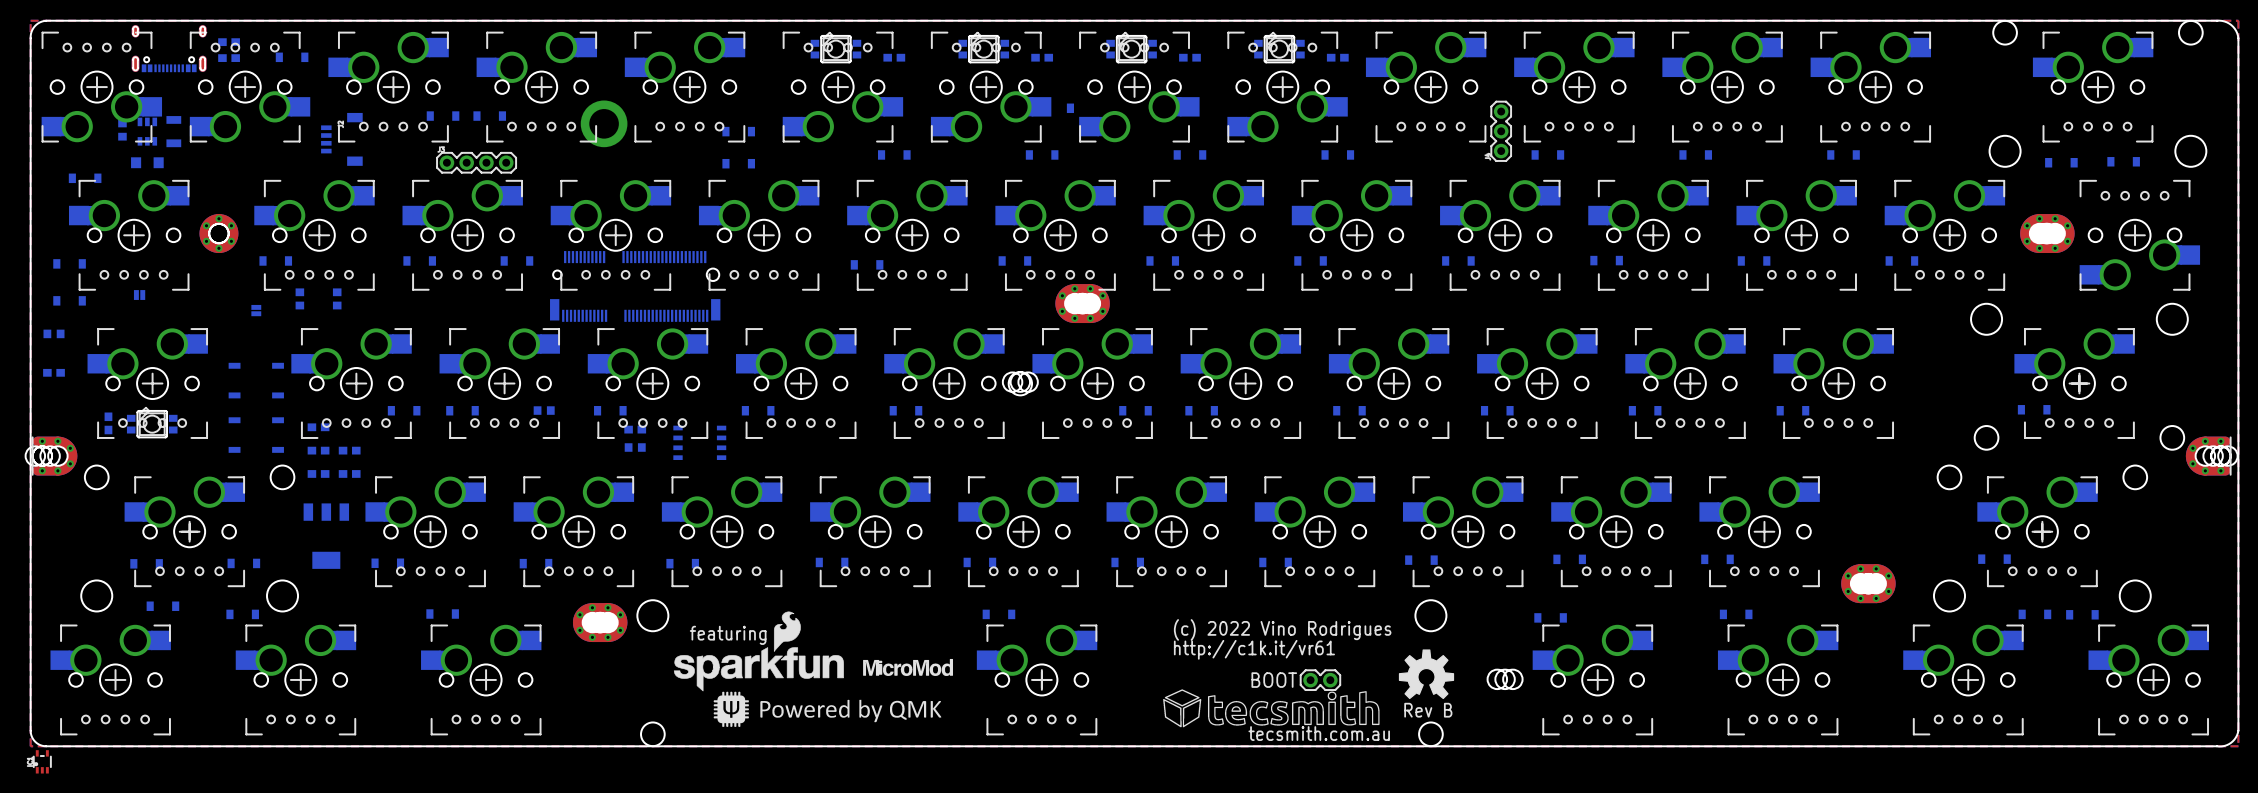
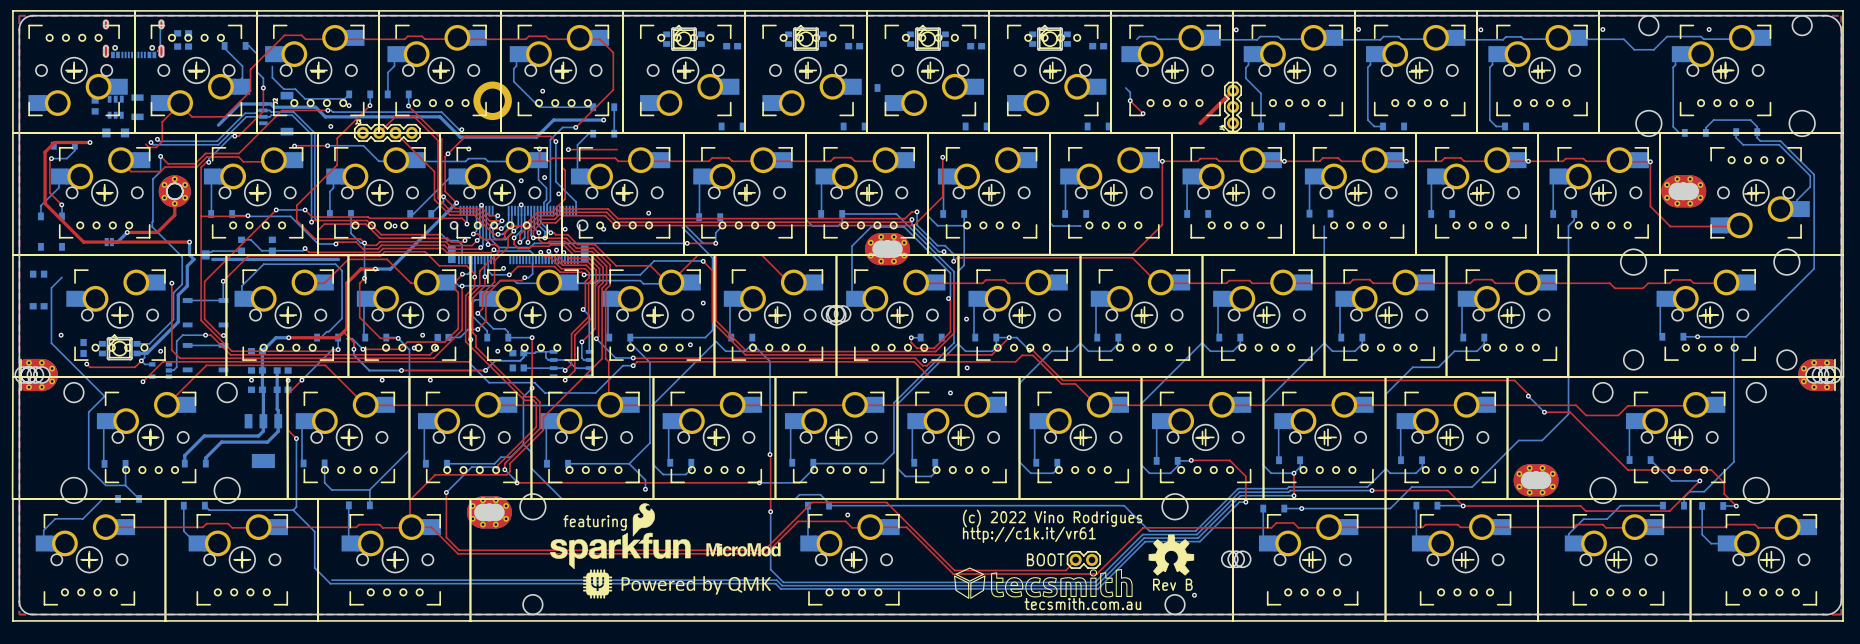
drawing: none -> [12, 10, 1844, 622]
bottom track: none -> (160, 27) (160, 48) (157, 51)
via: none -> (1236, 29)
via: none -> (1358, 29)
via: none -> (1480, 29)
via: none -> (1602, 29)
via: none -> (1709, 29)
bottom track: none -> (1136, 39) (1139, 36) (1154, 36) (1157, 39) (1188, 39)
bottom track: none -> (1209, 39) (1257, 39) (1260, 36) (1278, 36) (1280, 39) (1310, 39)
bottom track: none -> (1331, 39) (1380, 39) (1383, 36) (1398, 36) (1401, 39) (1432, 39)
bottom track: none -> (1453, 39) (1503, 39) (1505, 36) (1554, 39)
bottom track: none -> (1575, 39) (1623, 39) (1634, 49) (1653, 49) (1667, 36) (1737, 39)
bottom track: none -> (224, 46) (242, 66) (241, 88)
bottom track: none -> (245, 45) (248, 45) (257, 54) (257, 72) (263, 78) (263, 87)
bottom track: none -> (394, 55) (394, 66) (387, 72) (387, 94)
bottom track: none -> (516, 55) (513, 81) (539, 107) (593, 107)
bottom track: none -> (1248, 55) (1245, 78) (1261, 93) (1261, 126)
bottom track: none -> (1370, 55) (1370, 64) (1367, 67) (1367, 120) (1374, 126) (1383, 126)
bottom track: none -> (1492, 55) (1492, 64) (1489, 67) (1489, 120) (1496, 126) (1505, 126)
bottom track: none -> (1675, 55) (1675, 65) (1673, 67) (1673, 126) (1679, 132) (1684, 132)
bottom track: none -> (272, 66) (272, 77) (283, 89) (295, 89) (305, 98) (344, 98) (349, 94)
top track: none -> (263, 87) (263, 111) (238, 136) (234, 136)
via: none -> (263, 87)
bottom track: none -> (1125, 87) (1130, 92) (1130, 100)
top track: none -> (1233, 90) (1200, 123)
via: none -> (542, 91)
bottom track: none -> (370, 94) (369, 105)
bottom track: none -> (408, 94) (408, 105)
top track: none -> (1130, 100) (1143, 113)
via: none -> (1130, 100)
via: none -> (349, 105)
top track: none -> (369, 105) (337, 138) (337, 165) (296, 205) (296, 220) (315, 238) (360, 238) (366, 245) (376, 245) (379, 241) (445, 241) (449, 245) (472, 245) (477, 240)
via: none -> (369, 105)
top track: none -> (408, 105) (441, 138) (441, 194) (455, 208) (477, 208) (489, 220) (501, 220)
via: none -> (408, 105)
bottom track: none -> (614, 107) (615, 132)
bottom track: none -> (327, 110) (332, 112) (441, 112) (459, 129) (461, 129)
top track: none -> (327, 110) (282, 110) (238, 153) (205, 153) (195, 163) (168, 163) (160, 156)
via: none -> (327, 110)
via: none -> (1143, 113)
bottom track: none -> (603, 120) (553, 120) (536, 137) (460, 137) (439, 116) (325, 116) (315, 107) (273, 107) (270, 104) (239, 104) (218, 125)
via: none -> (603, 120)
via: none -> (330, 126)
bottom track: none -> (575, 127) (562, 127) (550, 139) (550, 200) (547, 204) (547, 214)
top track: none -> (575, 127) (613, 89) (613, 52) (599, 39) (548, 39) (545, 36) (528, 36) (525, 39) (424, 39) (421, 36) (407, 36) (404, 39) (305, 39) (301, 35) (284, 35) (250, 69) (250, 91) (224, 116) (191, 116) (179, 104) (162, 121) (162, 141) (156, 147) (148, 147) (145, 144)
via: none -> (575, 127)
via: none -> (461, 129)
bottom track: none -> (1736, 132) (1736, 137) (1743, 144) (1779, 144) (1810, 175) (1810, 186) (1797, 200) (1797, 210)
top track: none -> (379, 132) (395, 116) (414, 116) (438, 140) (438, 198) (451, 211) (475, 211) (492, 228) (501, 228)
top track: none -> (395, 132) (434, 171) (434, 199) (449, 215) (474, 215) (493, 234) (498, 234)
bottom track: none -> (1705, 132) (1705, 127) (1713, 120) (1750, 120) (1757, 126) (1757, 137) (1760, 141) (1780, 141) (1814, 174) (1814, 268) (1746, 336) (1683, 336)
bottom track: none -> (593, 133) (588, 133) (577, 145) (577, 177)
bottom track: none -> (234, 136) (231, 136) (208, 159) (208, 162)
via: none -> (234, 136)
bottom track: none -> (157, 139) (159, 141) (217, 141) (245, 113) (255, 113) (258, 110) (293, 111) (314, 133) (314, 218) (317, 221) (317, 230)
via: none -> (157, 139)
bottom track: none -> (555, 141) (555, 181) (576, 201) (576, 214)
top track: none -> (555, 141) (550, 136) (465, 136) (445, 156) (445, 191) (456, 202)
via: none -> (555, 141)
top track: none -> (90, 142) (54, 142) (45, 152) (45, 203) (83, 242) (189, 242)
via: none -> (90, 142)
bottom track: none -> (151, 142) (153, 144) (218, 144) (246, 116) (292, 115) (311, 134) (311, 222)
via: none -> (151, 142)
bottom track: none -> (74, 145) (74, 150) (66, 158) (51, 158)
via: none -> (294, 146)
bottom track: none -> (327, 145) (363, 145) (378, 161) (395, 161)
top track: none -> (327, 145) (294, 146)
via: none -> (327, 145)
via: none -> (468, 148)
bottom track: none -> (539, 148) (538, 180) (546, 188) (543, 214)
top track: none -> (539, 148) (539, 161)
via: none -> (539, 148)
top track: none -> (568, 149) (617, 149)
via: none -> (568, 149)
via: none -> (448, 153)
bottom track: none -> (160, 156) (160, 171) (152, 179) (152, 226) (182, 256) (182, 284) (173, 292) (173, 319) (149, 343) (137, 343)
via: none -> (160, 156)
top track: none -> (942, 157) (942, 196) (914, 225) (615, 225) (605, 215) (562, 215) (555, 222) (541, 222) (533, 230) (533, 237)
via: none -> (942, 157)
top track: none -> (51, 158) (49, 160) (49, 192) (61, 204)
via: none -> (51, 158)
top track: none -> (120, 161) (131, 171) (160, 171) (165, 167) (196, 167) (206, 156) (238, 156) (243, 161) (273, 161)
bottom track: none -> (416, 161) (465, 161) (468, 158) (485, 158) (488, 161) (517, 161)
top track: none -> (517, 161) (549, 161) (552, 158) (615, 158) (618, 161) (709, 161) (712, 157) (728, 157) (732, 161) (830, 161) (834, 157) (851, 157) (854, 161) (883, 161)
via: none -> (1162, 161)
via: none -> (1284, 161)
via: none -> (1406, 161)
via: none -> (1528, 161)
via: none -> (1650, 161)
top track: none -> (208, 162) (201, 167) (201, 320) (231, 351) (336, 351) (338, 349)
via: none -> (208, 162)
top track: none -> (562, 167) (565, 170) (565, 198) (551, 212) (537, 212) (523, 226) (511, 226) (504, 233) (502, 239) (483, 239) (477, 234) (473, 234)
bottom track: none -> (58, 177) (58, 187) (40, 205) (40, 216)
bottom track: none -> (211, 177) (211, 213)
bottom track: none -> (333, 177) (333, 188) (329, 191) (329, 213)
bottom track: none -> (455, 177) (449, 177) (413, 213) (410, 213)
via: none -> (544, 177)
bottom track: none -> (821, 177) (821, 213)
bottom track: none -> (943, 177) (943, 213)
bottom track: none -> (1065, 177) (1065, 213)
bottom track: none -> (1187, 177) (1187, 213)
bottom track: none -> (1309, 177) (1309, 213)
bottom track: none -> (1431, 177) (1431, 213)
bottom track: none -> (1553, 177) (1553, 213)
bottom track: none -> (699, 177) (699, 217)
via: none -> (521, 180)
via: none -> (558, 193)
bottom track: none -> (443, 196) (443, 201) (431, 213)
via: none -> (443, 196)
via: none -> (456, 202)
top track: none -> (174, 203) (174, 215) (157, 232) (127, 232)
bottom track: none -> (456, 203) (390, 269) (375, 269)
bottom track: none -> (61, 204) (62, 216)
via: none -> (61, 204)
via: none -> (521, 204)
top track: none -> (481, 205) (481, 207) (489, 215) (497, 215)
via: none -> (481, 205)
bottom track: none -> (276, 209) (305, 209)
top track: none -> (276, 209) (204, 281) (204, 319) (221, 335) (223, 335)
via: none -> (276, 209)
top track: none -> (305, 209) (312, 217) (462, 218) (466, 224)
via: none -> (305, 209)
bottom track: none -> (917, 211) (917, 225) (937, 245) (945, 245) (953, 254) (953, 261)
top track: none -> (917, 211) (911, 211) (905, 218) (617, 218) (608, 209) (560, 209) (553, 215) (538, 215) (519, 234) (519, 242)
via: none -> (917, 211)
bottom track: none -> (232, 213) (248, 216) (290, 216) (318, 243) (335, 243)
bottom track: none -> (350, 213) (350, 233) (360, 243) (364, 243) (364, 278)
via: none -> (648, 213)
bottom track: none -> (964, 213) (964, 265) (957, 271) (957, 343)
bottom track: none -> (1574, 213) (1574, 220) (1568, 226) (1568, 414) (1542, 440) (1518, 440) (1472, 487) (1411, 487) (1390, 508) (1284, 508)
bottom track: none -> (466, 214) (466, 224)
bottom track: none -> (476, 214) (476, 230) (473, 234)
bottom track: none -> (479, 214) (479, 237) (477, 240)
bottom track: none -> (482, 214) (482, 245) (480, 247)
bottom track: none -> (486, 214) (486, 240) (488, 244)
bottom track: none -> (508, 214) (508, 222) (501, 228)
bottom track: none -> (511, 214) (511, 225) (502, 234) (498, 234)
bottom track: none -> (518, 214) (518, 226) (505, 239) (495, 239) (493, 236) (493, 229) (501, 220)
bottom track: none -> (521, 214) (521, 230) (514, 237)
bottom track: none -> (524, 214) (524, 237) (519, 242)
bottom track: none -> (531, 214) (531, 235) (533, 237)
bottom track: none -> (534, 214) (534, 228) (538, 232)
bottom track: none -> (537, 214) (537, 224) (544, 231) (544, 237)
bottom track: none -> (540, 214) (540, 222) (550, 232)
top track: none -> (247, 215) (201, 216)
via: none -> (247, 215)
bottom track: none -> (497, 215) (496, 220) (489, 227) (489, 238) (499, 247) (530, 247) (534, 243) (687, 243)
via: none -> (497, 215)
bottom track: none -> (927, 216) (937, 225) (964, 225)
bottom track: none -> (720, 217) (720, 228) (715, 232) (715, 243) (703, 243) (685, 225)
bottom track: none -> (805, 219) (812, 226) (838, 226) (842, 221) (842, 213) (896, 213) (953, 271) (953, 342) (893, 402) (893, 452) (883, 463) (813, 462) (813, 469) (799, 482) (759, 482)
bottom track: none -> (911, 219) (911, 224) (938, 251) (944, 251)
top track: none -> (911, 219) (910, 222) (616, 222) (606, 212) (561, 212) (554, 219) (540, 219) (527, 231) (527, 242)
via: none -> (911, 219)
via: none -> (501, 220)
top track: none -> (311, 222) (313, 220) (367, 220) (381, 234) (438, 234) (440, 233)
via: none -> (311, 222)
bottom track: none -> (1049, 222) (1053, 226) (1080, 226)
via: none -> (466, 224)
via: none -> (395, 226)
bottom track: none -> (1324, 226) (1324, 342) (1332, 351) (1355, 351) (1362, 343) (1362, 337)
top track: none -> (1735, 226) (1670, 226) (1650, 206) (1650, 161) (1586, 161) (1583, 158) (1565, 158) (1563, 161) (1464, 161) (1460, 157) (1444, 157) (1441, 161) (1341, 161) (1338, 157) (1323, 157) (1319, 161) (1219, 161) (1216, 158) (1200, 158) (1197, 161) (1162, 161) (1162, 224) (1132, 254) (946, 254) (944, 251)
bottom track: none -> (682, 227) (712, 257) (712, 330) (705, 337) (630, 337) (630, 342) (649, 362) (649, 443) (629, 463)
via: none -> (501, 228)
via: none -> (565, 229)
via: none -> (603, 229)
top track: none -> (317, 230) (324, 224) (365, 224) (379, 238) (447, 238) (451, 242) (465, 240)
top track: none -> (513, 231) (508, 236) (508, 247) (494, 260) (494, 282) (482, 294) (482, 308) (477, 313)
via: none -> (513, 231)
bottom track: none -> (127, 232) (117, 242) (111, 242)
via: none -> (127, 232)
top track: none -> (538, 232) (538, 239) (542, 243) (564, 241) (574, 251) (591, 251) (606, 266) (606, 283) (602, 288) (602, 358) (543, 417) (543, 430) (509, 463) (509, 471) (506, 474) (435, 474) (410, 499) (410, 527)
via: none -> (538, 232)
top track: none -> (550, 232) (567, 234) (577, 244) (595, 244) (616, 265) (650, 265) (668, 283) (698, 254) (761, 254) (790, 283)
via: none -> (550, 232)
bottom track: none -> (440, 233) (447, 240) (457, 240) (462, 244) (462, 263)
via: none -> (473, 234)
via: none -> (498, 234)
top track: none -> (514, 237) (514, 244) (518, 248) (563, 244) (573, 255) (590, 255) (603, 267) (603, 282) (598, 287) (598, 336) (596, 338)
via: none -> (514, 237)
via: none -> (533, 237)
top track: none -> (544, 237) (566, 238) (576, 248) (593, 248) (610, 264) (610, 285) (605, 289) (605, 358) (608, 361) (608, 405) (974, 405)
via: none -> (544, 237)
bottom track: none -> (241, 239) (250, 239) (261, 250) (302, 250) (305, 248)
via: none -> (465, 240)
via: none -> (477, 240)
bottom track: none -> (189, 242) (189, 254) (194, 259) (187, 266) (187, 286) (178, 295) (178, 322) (146, 353) (137, 353)
via: none -> (189, 242)
via: none -> (519, 242)
via: none -> (527, 242)
via: none -> (364, 243)
top track: none -> (687, 243) (715, 243)
via: none -> (687, 243)
via: none -> (715, 243)
top track: none -> (335, 243) (337, 242) (356, 242) (362, 248) (378, 248) (381, 245) (444, 245) (448, 249) (479, 249) (480, 247)
via: none -> (335, 243)
top track: none -> (488, 244) (495, 244) (499, 247) (499, 251) (479, 270) (479, 286) (469, 296) (469, 338) (470, 339)
via: none -> (488, 244)
via: none -> (480, 247)
top track: none -> (305, 248) (308, 252) (379, 252) (383, 248) (442, 248) (447, 252) (491, 252) (493, 249)
via: none -> (305, 248)
bottom track: none -> (493, 249) (530, 251) (535, 256) (535, 263)
via: none -> (493, 249)
top track: none -> (556, 250) (556, 254) (564, 261) (587, 261) (596, 270) (596, 280) (592, 284) (592, 317) (574, 335) (574, 370) (565, 380)
via: none -> (556, 250)
bottom track: none -> (241, 250) (205, 252)
top track: none -> (548, 251) (562, 265) (586, 265) (592, 271) (592, 278) (588, 282) (588, 316) (571, 333) (571, 364) (565, 370)
via: none -> (548, 251)
via: none -> (944, 251)
top track: none -> (540, 252) (544, 256) (549, 256) (561, 268) (585, 268) (589, 272) (589, 277) (585, 281) (585, 307) (583, 309)
via: none -> (540, 252)
top track: none -> (563, 252) (569, 258) (589, 258) (599, 268) (599, 281) (595, 285) (595, 328) (581, 341)
via: none -> (563, 252)
top track: none -> (716, 254) (716, 320) (746, 351) (935, 351) (954, 332) (954, 283)
bottom track: none -> (212, 259) (338, 259)
bottom track: none -> (703, 261) (654, 261) (640, 274) (584, 274)
top track: none -> (703, 261) (712, 270) (712, 321) (745, 354) (991, 354) (1009, 337)
via: none -> (703, 261)
top track: none -> (953, 261) (957, 257) (1132, 257) (1157, 283) (1226, 283) (1229, 280) (1249, 280) (1252, 283) (1349, 283) (1353, 279) (1369, 279) (1373, 283) (1470, 283) (1473, 279) (1491, 279) (1495, 283) (1609, 283) (1614, 288) (1643, 288) (1648, 283) (1669, 283) (1672, 279) (1690, 279) (1693, 283) (1722, 283)
via: none -> (953, 261)
bottom track: none -> (471, 263) (471, 270) (467, 274) (462, 274)
bottom track: none -> (474, 263) (474, 277)
bottom track: none -> (484, 263) (484, 276)
bottom track: none -> (487, 263) (488, 271) (492, 274) (509, 274)
bottom track: none -> (532, 263) (532, 274) (528, 277) (524, 277)
via: none -> (503, 268)
top track: none -> (375, 269) (360, 269) (346, 283) (346, 328) (337, 337) (288, 337)
via: none -> (375, 269)
top track: none -> (462, 274) (455, 281) (455, 289) (458, 292) (458, 328) (444, 342) (407, 342) (400, 349) (362, 349)
via: none -> (462, 274)
top track: none -> (509, 274) (517, 266) (554, 266) (560, 272) (581, 272) (584, 274)
via: none -> (509, 274)
via: none -> (584, 274)
bottom track: none -> (62, 277) (51, 287) (51, 343) (104, 396) (88, 412) (88, 468) (105, 485) (125, 485)
via: none -> (474, 277)
top track: none -> (484, 276) (484, 286) (472, 298) (472, 332) (475, 335) (475, 347) (525, 396) (534, 396) (539, 401) (539, 428) (504, 463) (504, 469)
via: none -> (484, 276)
top track: none -> (364, 278) (359, 283) (359, 317) (380, 338) (398, 338)
via: none -> (364, 278)
top track: none -> (524, 277) (521, 280) (500, 280) (485, 295) (485, 321) (477, 329)
via: none -> (524, 277)
bottom track: none -> (223, 281) (223, 300) (187, 300)
top track: none -> (223, 281) (248, 255) (380, 255) (384, 251) (425, 251) (439, 265) (466, 265) (474, 273) (474, 286) (465, 295) (465, 341) (524, 400) (533, 400) (536, 403) (536, 426) (498, 465) (498, 469)
via: none -> (223, 281)
top track: none -> (171, 283) (171, 350) (179, 358) (433, 358) (462, 330) (462, 286)
via: none -> (171, 283)
top track: none -> (303, 283) (324, 283) (348, 259) (387, 259) (411, 283) (425, 283)
bottom track: none -> (446, 283) (456, 283) (458, 286) (495, 285) (500, 280) (514, 280) (517, 283) (547, 283)
bottom track: none -> (568, 283) (594, 283) (597, 280) (640, 280) (643, 283) (669, 283)
top track: none -> (913, 283) (982, 283) (985, 279) (1004, 279) (1007, 283) (1036, 283)
via: none -> (462, 286)
bottom track: none -> (948, 298) (950, 296) (950, 273) (904, 226) (871, 226) (851, 246) (851, 299)
top track: none -> (948, 298) (950, 300) (950, 331) (934, 348) (917, 348) (911, 342) (911, 337)
via: none -> (948, 298)
bottom track: none -> (241, 299) (241, 285) (263, 264) (335, 264) (342, 270) (342, 318) (328, 331) (320, 337) (317, 337)
bottom track: none -> (363, 299) (365, 337)
bottom track: none -> (485, 299) (475, 299) (472, 303) (472, 315) (487, 330) (487, 337)
bottom track: none -> (607, 299) (609, 337)
bottom track: none -> (729, 299) (731, 337)
bottom track: none -> (974, 299) (975, 337)
bottom track: none -> (1096, 299) (1097, 337)
bottom track: none -> (1218, 299) (1219, 337)
bottom track: none -> (1340, 299) (1341, 337)
bottom track: none -> (1462, 299) (1463, 337)
bottom track: none -> (1660, 299) (1660, 334) (1662, 336)
via: none -> (703, 303)
bottom track: none -> (583, 309) (589, 315) (589, 351)
via: none -> (583, 309)
bottom track: none -> (477, 313) (493, 328) (505, 328) (508, 332) (508, 337)
via: none -> (477, 313)
via: none -> (966, 319)
bottom track: none -> (477, 329) (468, 329) (460, 337) (448, 337)
via: none -> (477, 329)
top track: none -> (343, 331) (353, 342) (353, 349)
via: none -> (61, 335)
bottom track: none -> (205, 335) (182, 335) (176, 341) (176, 367) (173, 370) (168, 370)
top track: none -> (205, 335) (210, 335) (230, 354) (429, 354) (436, 348)
via: none -> (205, 335)
via: none -> (422, 335)
via: none -> (223, 335)
via: none -> (1697, 336)
bottom track: none -> (1733, 336) (1733, 462) (1704, 491) (1689, 491) (1684, 497) (1684, 505)
bottom track: none -> (288, 337) (275, 337) (262, 351) (263, 431) (258, 435) (204, 435) (184, 455) (184, 463)
via: none -> (288, 337)
bottom track: none -> (338, 337) (338, 349)
bottom track: none -> (386, 337) (397, 337) (409, 349) (409, 450) (369, 489)
bottom track: none -> (508, 337) (532, 337)
top track: none -> (532, 337) (532, 388)
via: none -> (532, 337)
via: none -> (911, 337)
bottom track: none -> (920, 337) (911, 337)
via: none -> (1009, 337)
bottom track: none -> (1118, 337) (1118, 343) (1111, 351) (1088, 351) (1080, 343) (1072, 351) (1051, 351) (1019, 383) (1019, 462) (1030, 473) (1053, 473) (1057, 469) (1057, 462)
bottom track: none -> (1240, 337) (1240, 343) (1233, 351) (1210, 351) (1202, 342) (1141, 403) (1141, 465) (1149, 473) (1170, 473) (1177, 466) (1177, 460) (1191, 460)
bottom track: none -> (1484, 337) (1484, 343) (1477, 351) (1454, 351) (1438, 367) (1412, 367) (1385, 394) (1385, 468)
via: none -> (398, 338)
bottom track: none -> (346, 338) (352, 338) (362, 349)
bottom track: none -> (596, 338) (615, 357) (633, 357)
via: none -> (596, 338)
bottom track: none -> (470, 339) (470, 364) (489, 382) (534, 382) (544, 392) (595, 392) (622, 365) (633, 365)
via: none -> (470, 339)
bottom track: none -> (581, 341) (581, 357) (589, 359)
via: none -> (581, 341)
bottom track: none -> (1324, 343) (1263, 404) (1263, 465) (1271, 473) (1294, 473) (1300, 466) (1300, 460)
via: none -> (690, 344)
bottom track: none -> (187, 345) (223, 345)
via: none -> (414, 348)
via: none -> (436, 348)
bottom track: none -> (353, 349) (353, 355) (369, 370) (401, 370)
via: none -> (353, 349)
via: none -> (362, 349)
bottom track: none -> (338, 349) (332, 349) (301, 380)
via: none -> (338, 349)
bottom track: none -> (1029, 350) (1016, 337) (996, 337) (996, 347) (992, 351) (965, 351) (958, 343) (897, 404) (897, 468) (905, 476) (931, 476) (935, 472) (935, 462)
top track: none -> (1029, 350) (1032, 350) (1062, 380) (1514, 380) (1528, 396)
via: none -> (1029, 350)
via: none -> (160, 351)
via: none -> (497, 351)
bottom track: none -> (545, 351) (545, 357) (548, 359) (567, 359) (575, 368) (589, 368)
bottom track: none -> (553, 351) (523, 353) (523, 357) (520, 360) (495, 360) (485, 370)
bottom track: none -> (144, 353) (144, 357) (141, 360) (144, 364) (152, 364)
top track: none -> (633, 357) (915, 358) (922, 365) (927, 365) (930, 361) (1015, 361) (1022, 355) (1032, 355) (1061, 383) (1075, 383) (1096, 405) (1576, 405) (1586, 415) (1618, 415) (1627, 405) (1691, 405)
via: none -> (633, 357)
top track: none -> (141, 360) (134, 367) (90, 367) (86, 364)
via: none -> (141, 360)
top track: none -> (470, 360) (468, 361) (162, 361) (142, 381)
via: none -> (924, 360)
via: none -> (86, 364)
top track: none -> (633, 365) (637, 361) (914, 361) (929, 376) (934, 376)
via: none -> (633, 365)
bottom track: none -> (523, 367) (562, 368) (565, 370)
via: none -> (967, 367)
part: none -> (160, 370)
bottom track: none -> (277, 370) (278, 431) (267, 442) (221, 442) (205, 457) (205, 463)
top track: none -> (401, 370) (485, 370)
via: none -> (401, 370)
via: none -> (485, 370)
via: none -> (565, 370)
via: none -> (251, 380)
via: none -> (288, 380)
top track: none -> (301, 380) (287, 394) (287, 429) (296, 438)
via: none -> (301, 380)
via: none -> (382, 380)
via: none -> (430, 380)
via: none -> (565, 380)
via: none -> (142, 381)
bottom track: none -> (532, 388) (523, 396) (523, 444)
via: none -> (532, 388)
via: none -> (950, 392)
bottom track: none -> (1528, 396) (1544, 412)
via: none -> (1528, 396)
top track: none -> (166, 405) (206, 365) (325, 365) (365, 405)
top track: none -> (364, 405) (531, 405)
bottom track: none -> (608, 405) (531, 405)
top track: none -> (1544, 412) (1570, 412) (1627, 470) (1711, 470) (1724, 482) (1724, 494) (1736, 506)
via: none -> (1544, 412)
bottom track: none -> (104, 421) (104, 463)
bottom track: none -> (302, 421) (302, 461) (303, 463)
bottom track: none -> (424, 421) (424, 462) (425, 463)
bottom track: none -> (546, 421) (546, 463)
bottom track: none -> (668, 421) (668, 461) (670, 462)
bottom track: none -> (790, 421) (790, 461) (792, 462)
bottom track: none -> (912, 421) (912, 460) (914, 462)
bottom track: none -> (1035, 421) (1034, 461) (1036, 462)
bottom track: none -> (1157, 421) (1156, 460)
bottom track: none -> (1279, 421) (1278, 460)
bottom track: none -> (1401, 421) (1400, 460)
bottom track: none -> (1629, 421) (1629, 460)
bottom track: none -> (296, 438) (296, 506) (293, 510)
via: none -> (296, 438)
bottom track: none -> (523, 444) (531, 452) (531, 468) (561, 498) (795, 498) (799, 494) (820, 494) (829, 505) (1124, 505) (1149, 531) (1195, 531) (1238, 488) (1367, 487) (1385, 468)
bottom track: none -> (523, 444) (510, 457) (501, 457) (494, 463) (446, 463)
bottom track: none -> (770, 454) (770, 361) (752, 343) (744, 351) (725, 351) (716, 341) (653, 404) (653, 464) (663, 474) (685, 474) (691, 469) (691, 462)
top track: none -> (770, 454) (770, 511)
via: none -> (770, 454)
top track: none -> (1191, 460) (1229, 460) (1245, 476) (1245, 502)
via: none -> (1191, 460)
bottom track: none -> (1422, 460) (1422, 466) (1416, 473) (1390, 473) (1385, 468)
bottom track: none -> (1650, 460) (1671, 480) (1699, 480)
bottom track: none -> (125, 463) (125, 485)
bottom track: none -> (324, 463) (324, 482) (331, 489) (369, 489)
bottom track: none -> (568, 463) (629, 463)
bottom track: none -> (629, 463) (645, 479) (645, 489)
bottom track: none -> (498, 469) (495, 467) (471, 467) (446, 492)
bottom track: none -> (504, 469) (517, 482)
via: none -> (504, 469)
top track: none -> (1294, 473) (1294, 495)
via: none -> (1294, 473)
top track: none -> (1699, 480) (1669, 511) (1585, 511) (1580, 505) (1463, 505) (1447, 490) (1372, 490)
via: none -> (1699, 480)
top track: none -> (517, 482) (759, 482)
via: none -> (517, 482)
via: none -> (759, 482)
bottom track: none -> (125, 485) (139, 498)
via: none -> (645, 489)
bottom track: none -> (369, 489) (369, 505)
bottom track: none -> (1372, 490) (1239, 492) (1197, 534) (1142, 534) (1094, 582) (783, 582) (770, 569) (770, 511)
via: none -> (1372, 490)
top track: none -> (446, 492) (446, 537) (459, 550) (764, 550) (812, 502) (886, 502) (954, 570) (1066, 570) (1075, 559)
via: none -> (446, 492)
bottom track: none -> (1294, 495) (1240, 495) (1198, 538)
via: none -> (1294, 495)
bottom track: none -> (118, 498) (102, 498) (82, 518) (55, 518) (43, 530) (43, 543)
bottom track: none -> (1245, 502) (1239, 502) (1199, 541) (1145, 541) (1098, 588) (780, 588) (775, 583) (330, 583) (314, 567) (314, 531) (293, 510)
via: none -> (1245, 502)
bottom track: none -> (183, 505) (183, 531) (196, 543)
bottom track: none -> (204, 505) (209, 510) (293, 510)
bottom track: none -> (348, 505) (348, 543)
bottom track: none -> (807, 505) (807, 541) (806, 543)
bottom track: none -> (1416, 505) (1416, 543)
bottom track: none -> (1437, 505) (1463, 505)
via: none -> (1463, 505)
bottom track: none -> (1662, 505) (1620, 505) (1607, 519) (1583, 519) (1568, 533) (1568, 543)
bottom track: none -> (1702, 505) (1702, 534) (1711, 543) (1721, 543)
bottom track: none -> (1723, 505) (1736, 506)
via: none -> (1736, 506)
bottom track: none -> (1263, 508) (1263, 543)
via: none -> (1301, 508)
via: none -> (770, 511)
via: none -> (847, 514)
top track: none -> (105, 527) (202, 527) (206, 523) (228, 523) (232, 527) (356, 527) (359, 524) (379, 524) (382, 527) (410, 527)
top track: none -> (1783, 527) (1758, 527) (1755, 524) (1727, 524) (1724, 527) (1630, 527) (1606, 527) (1602, 524) (1576, 524) (1573, 527) (1460, 527) (1457, 524) (1425, 524) (1422, 527) (1298, 527) (1293, 523) (1276, 523) (1271, 527) (1143, 527) (1096, 574) (953, 574) (906, 527) (852, 527) (845, 521) (798, 521) (765, 553) (457, 553) (431, 527) (410, 527)
bottom track: none -> (1198, 538) (1144, 538) (1096, 585) (782, 585) (776, 580) (331, 580)
via: none -> (1194, 595)
part: (42, 761) -> none

